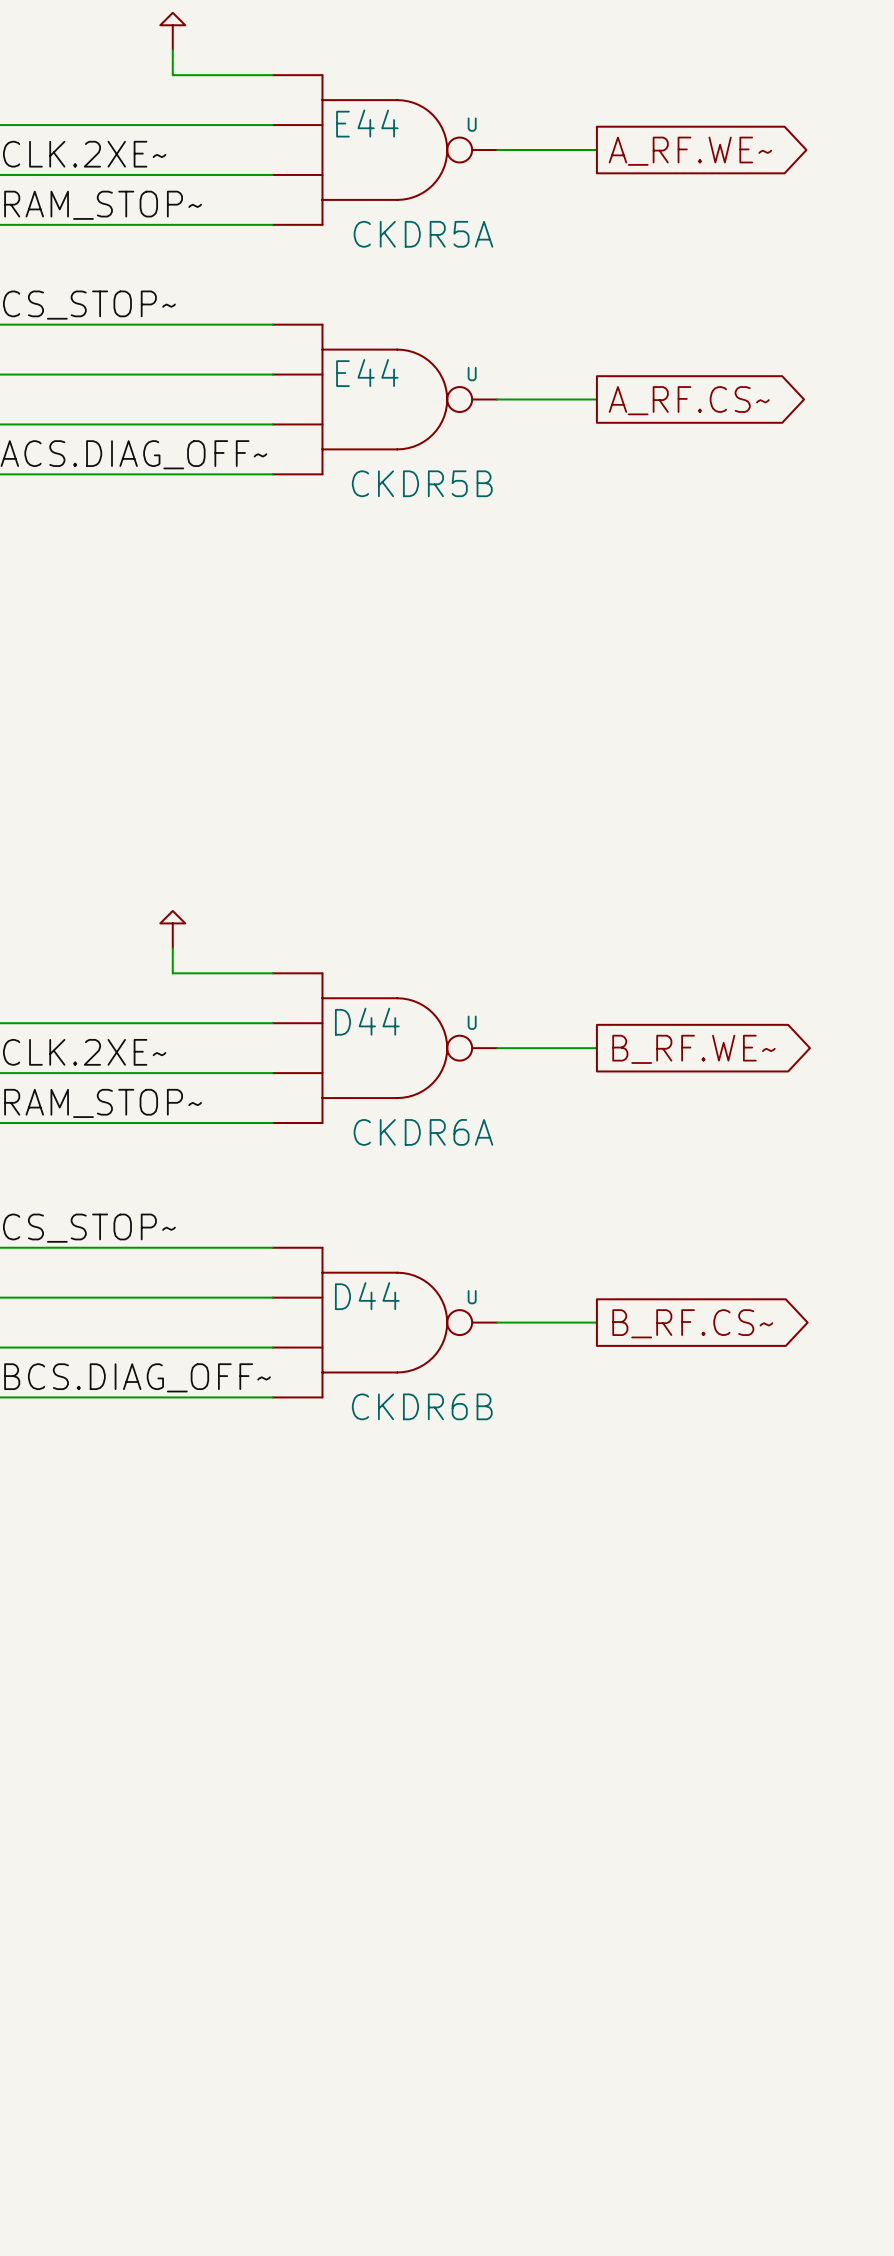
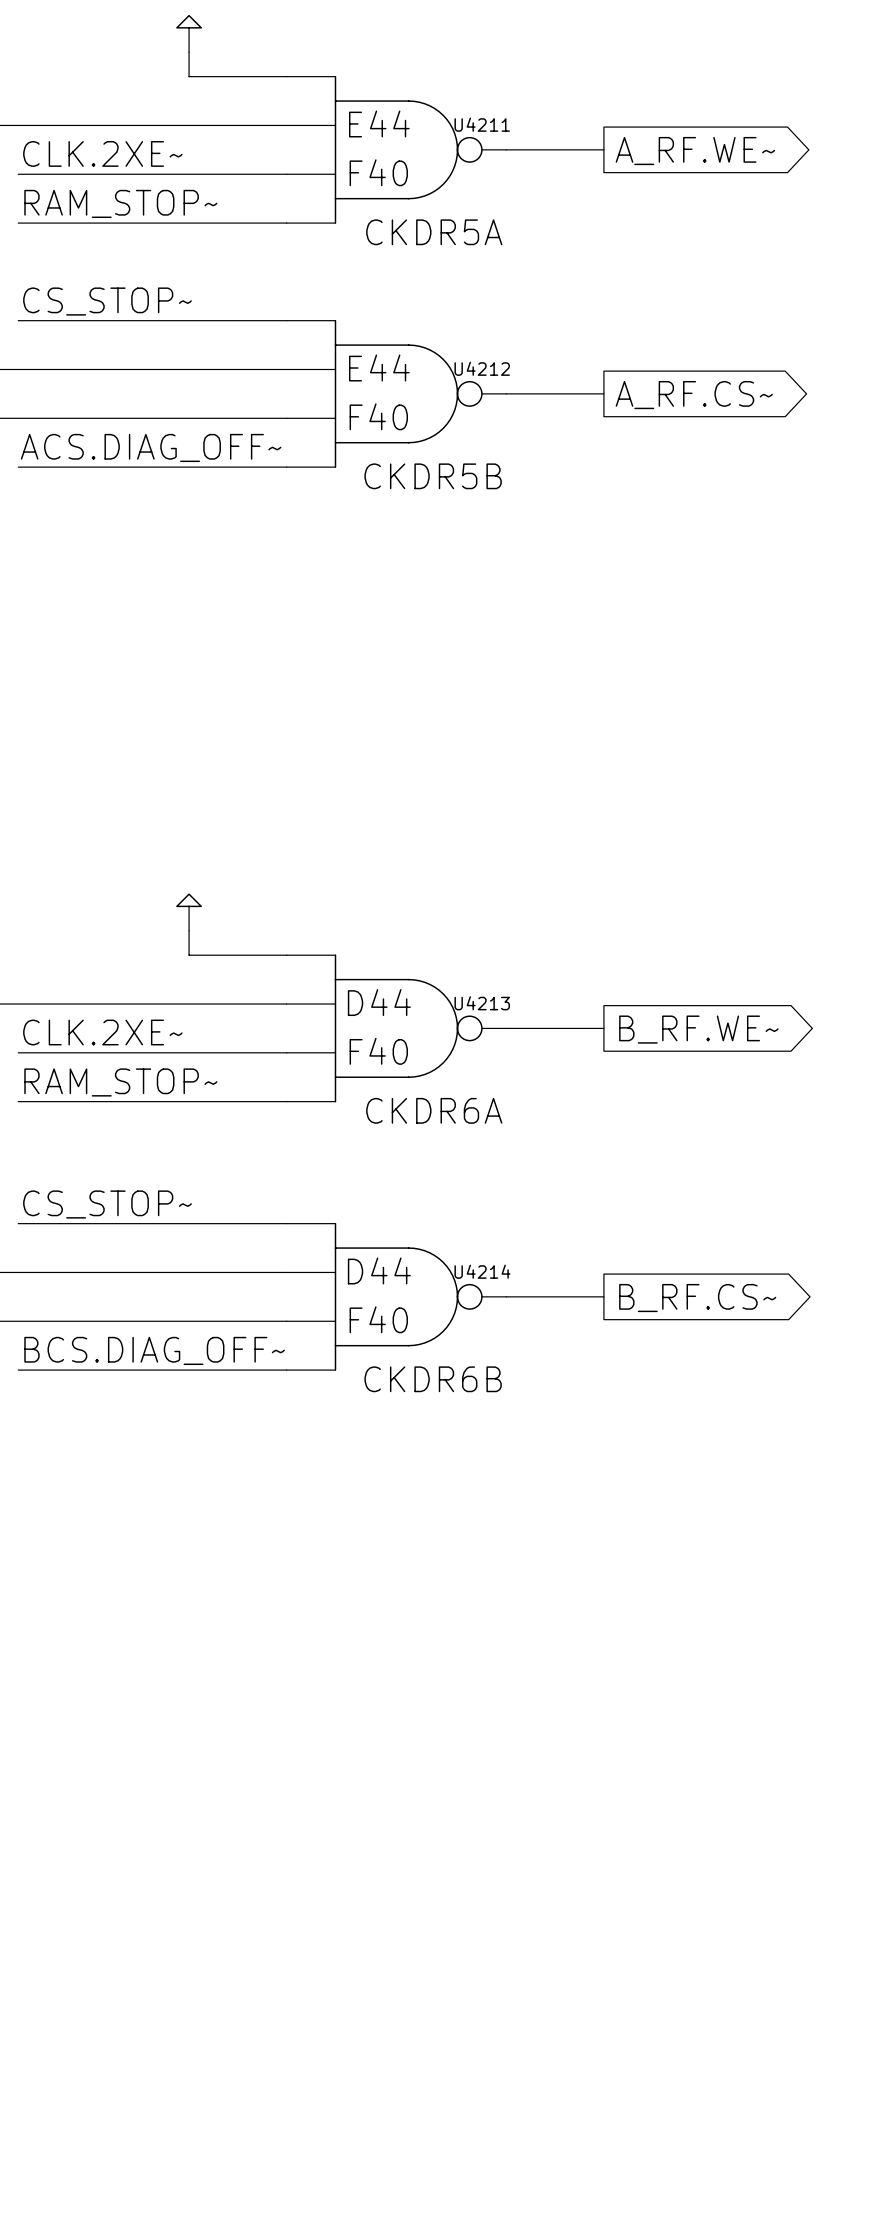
U name: U (472, 124) -> U4211 (482, 124)
U value: none -> F40 (378, 172)
U name: U (472, 374) -> U4212 (482, 368)
U value: none -> F40 (378, 416)
U name: U (472, 1022) -> U4213 (482, 1003)
U value: none -> F40 (378, 1051)
U name: U (472, 1297) -> U4214 (482, 1271)
U value: none -> F40 (378, 1319)

